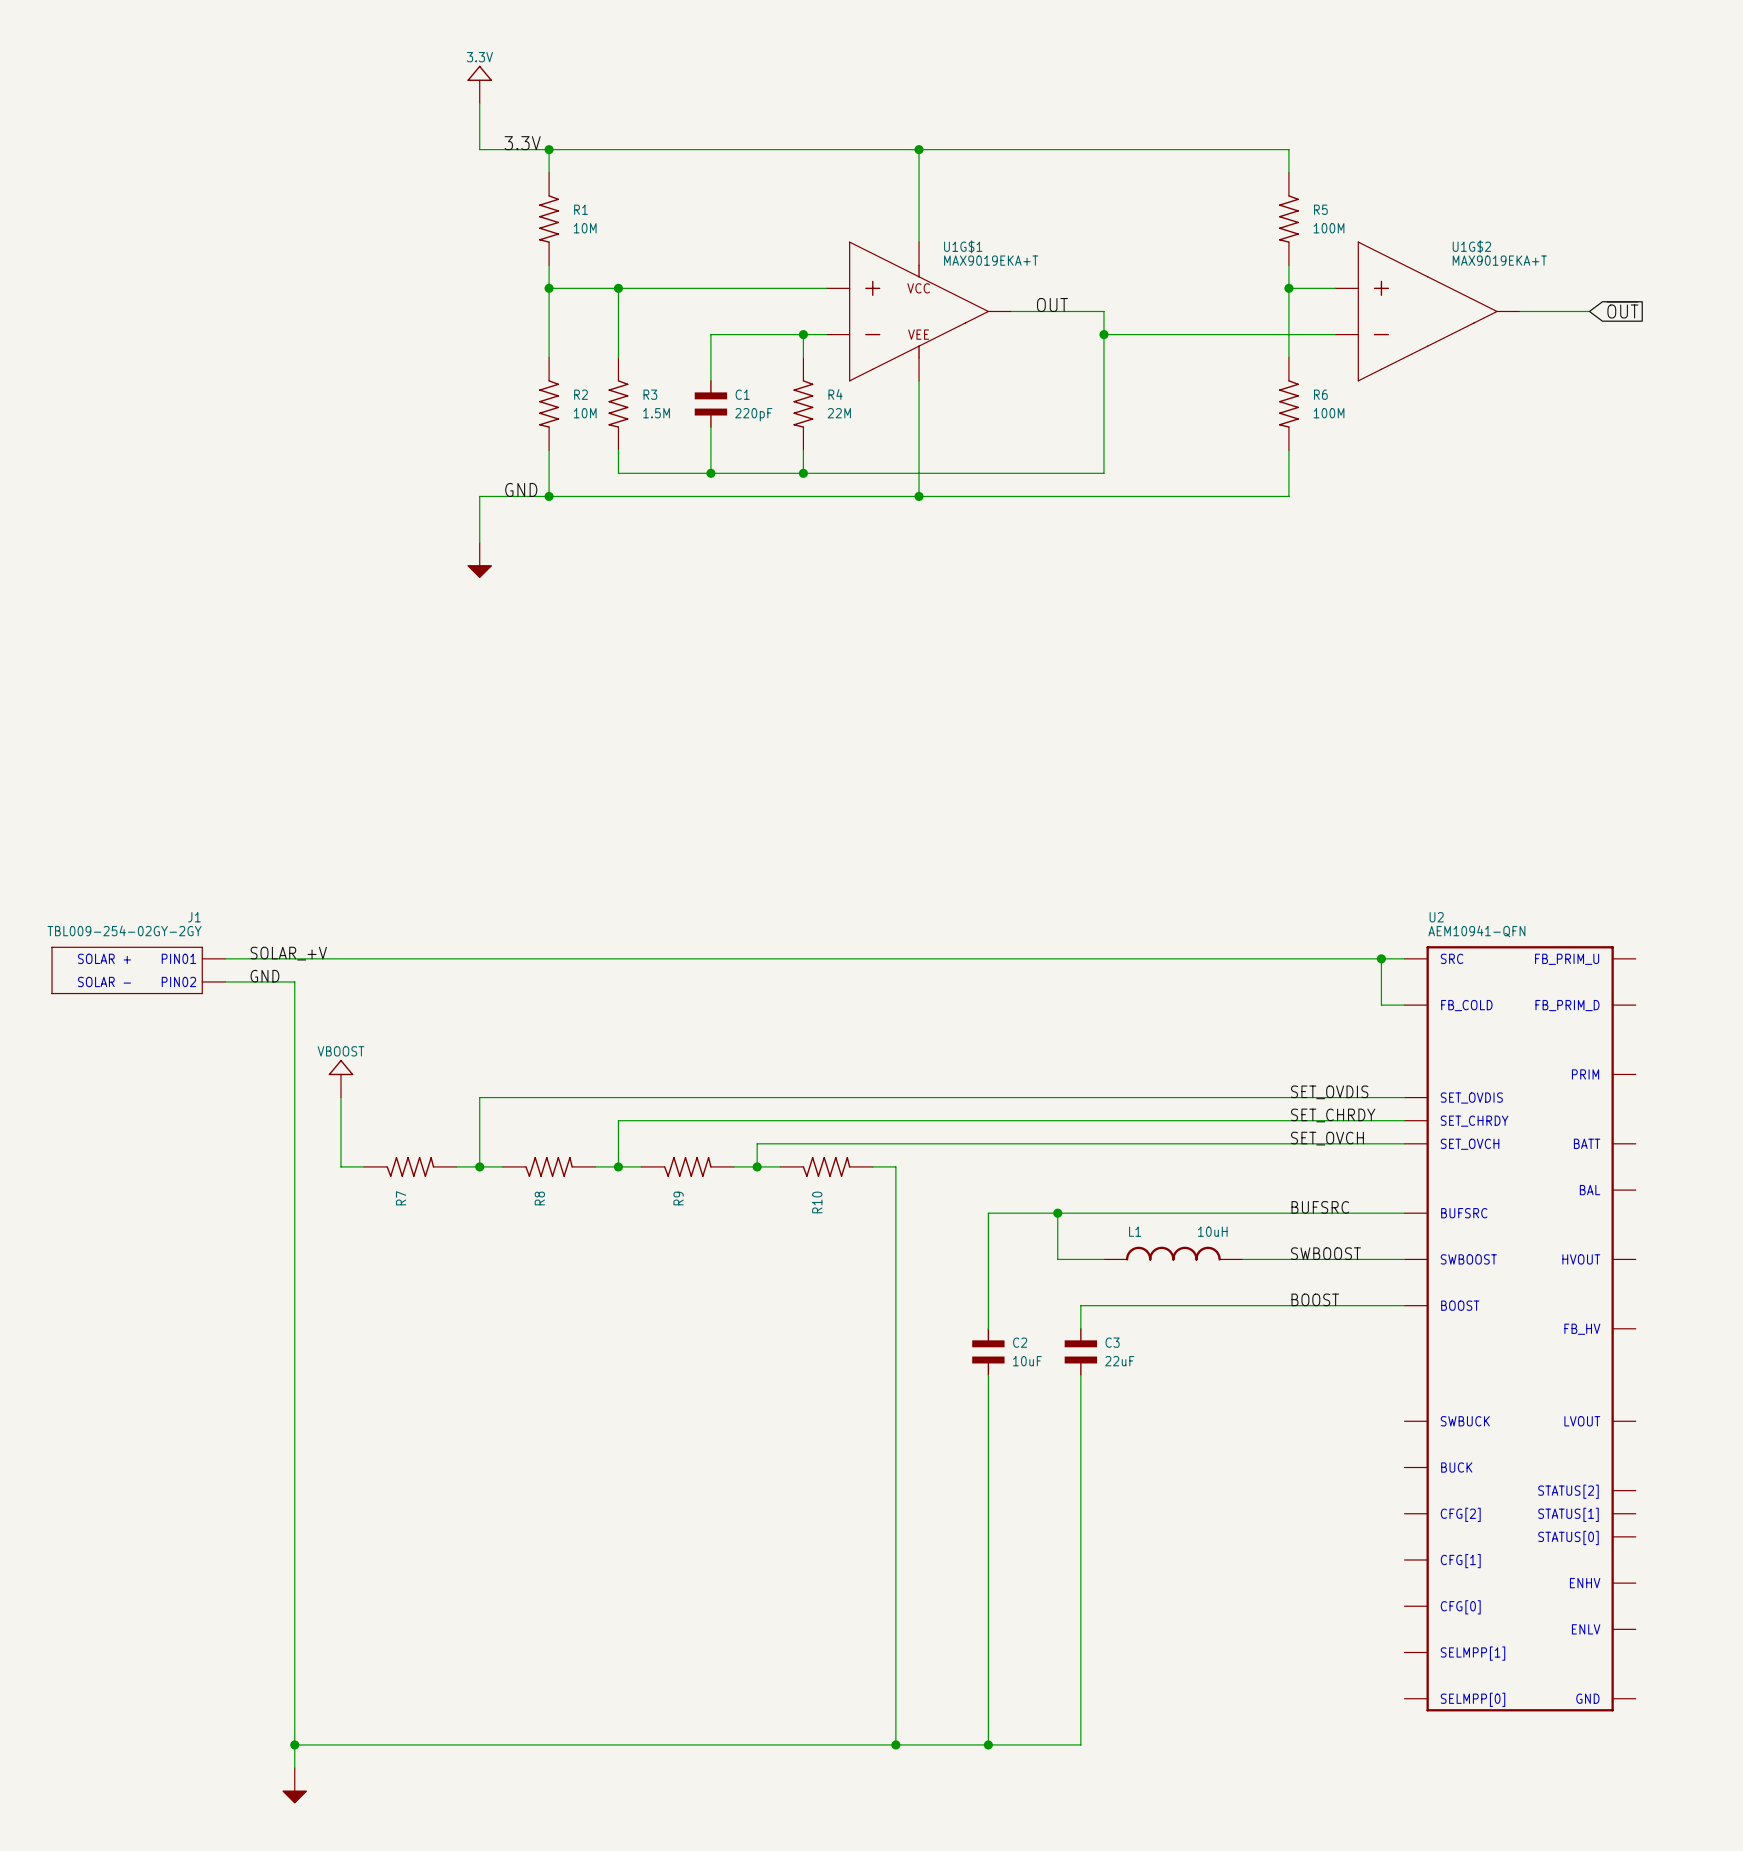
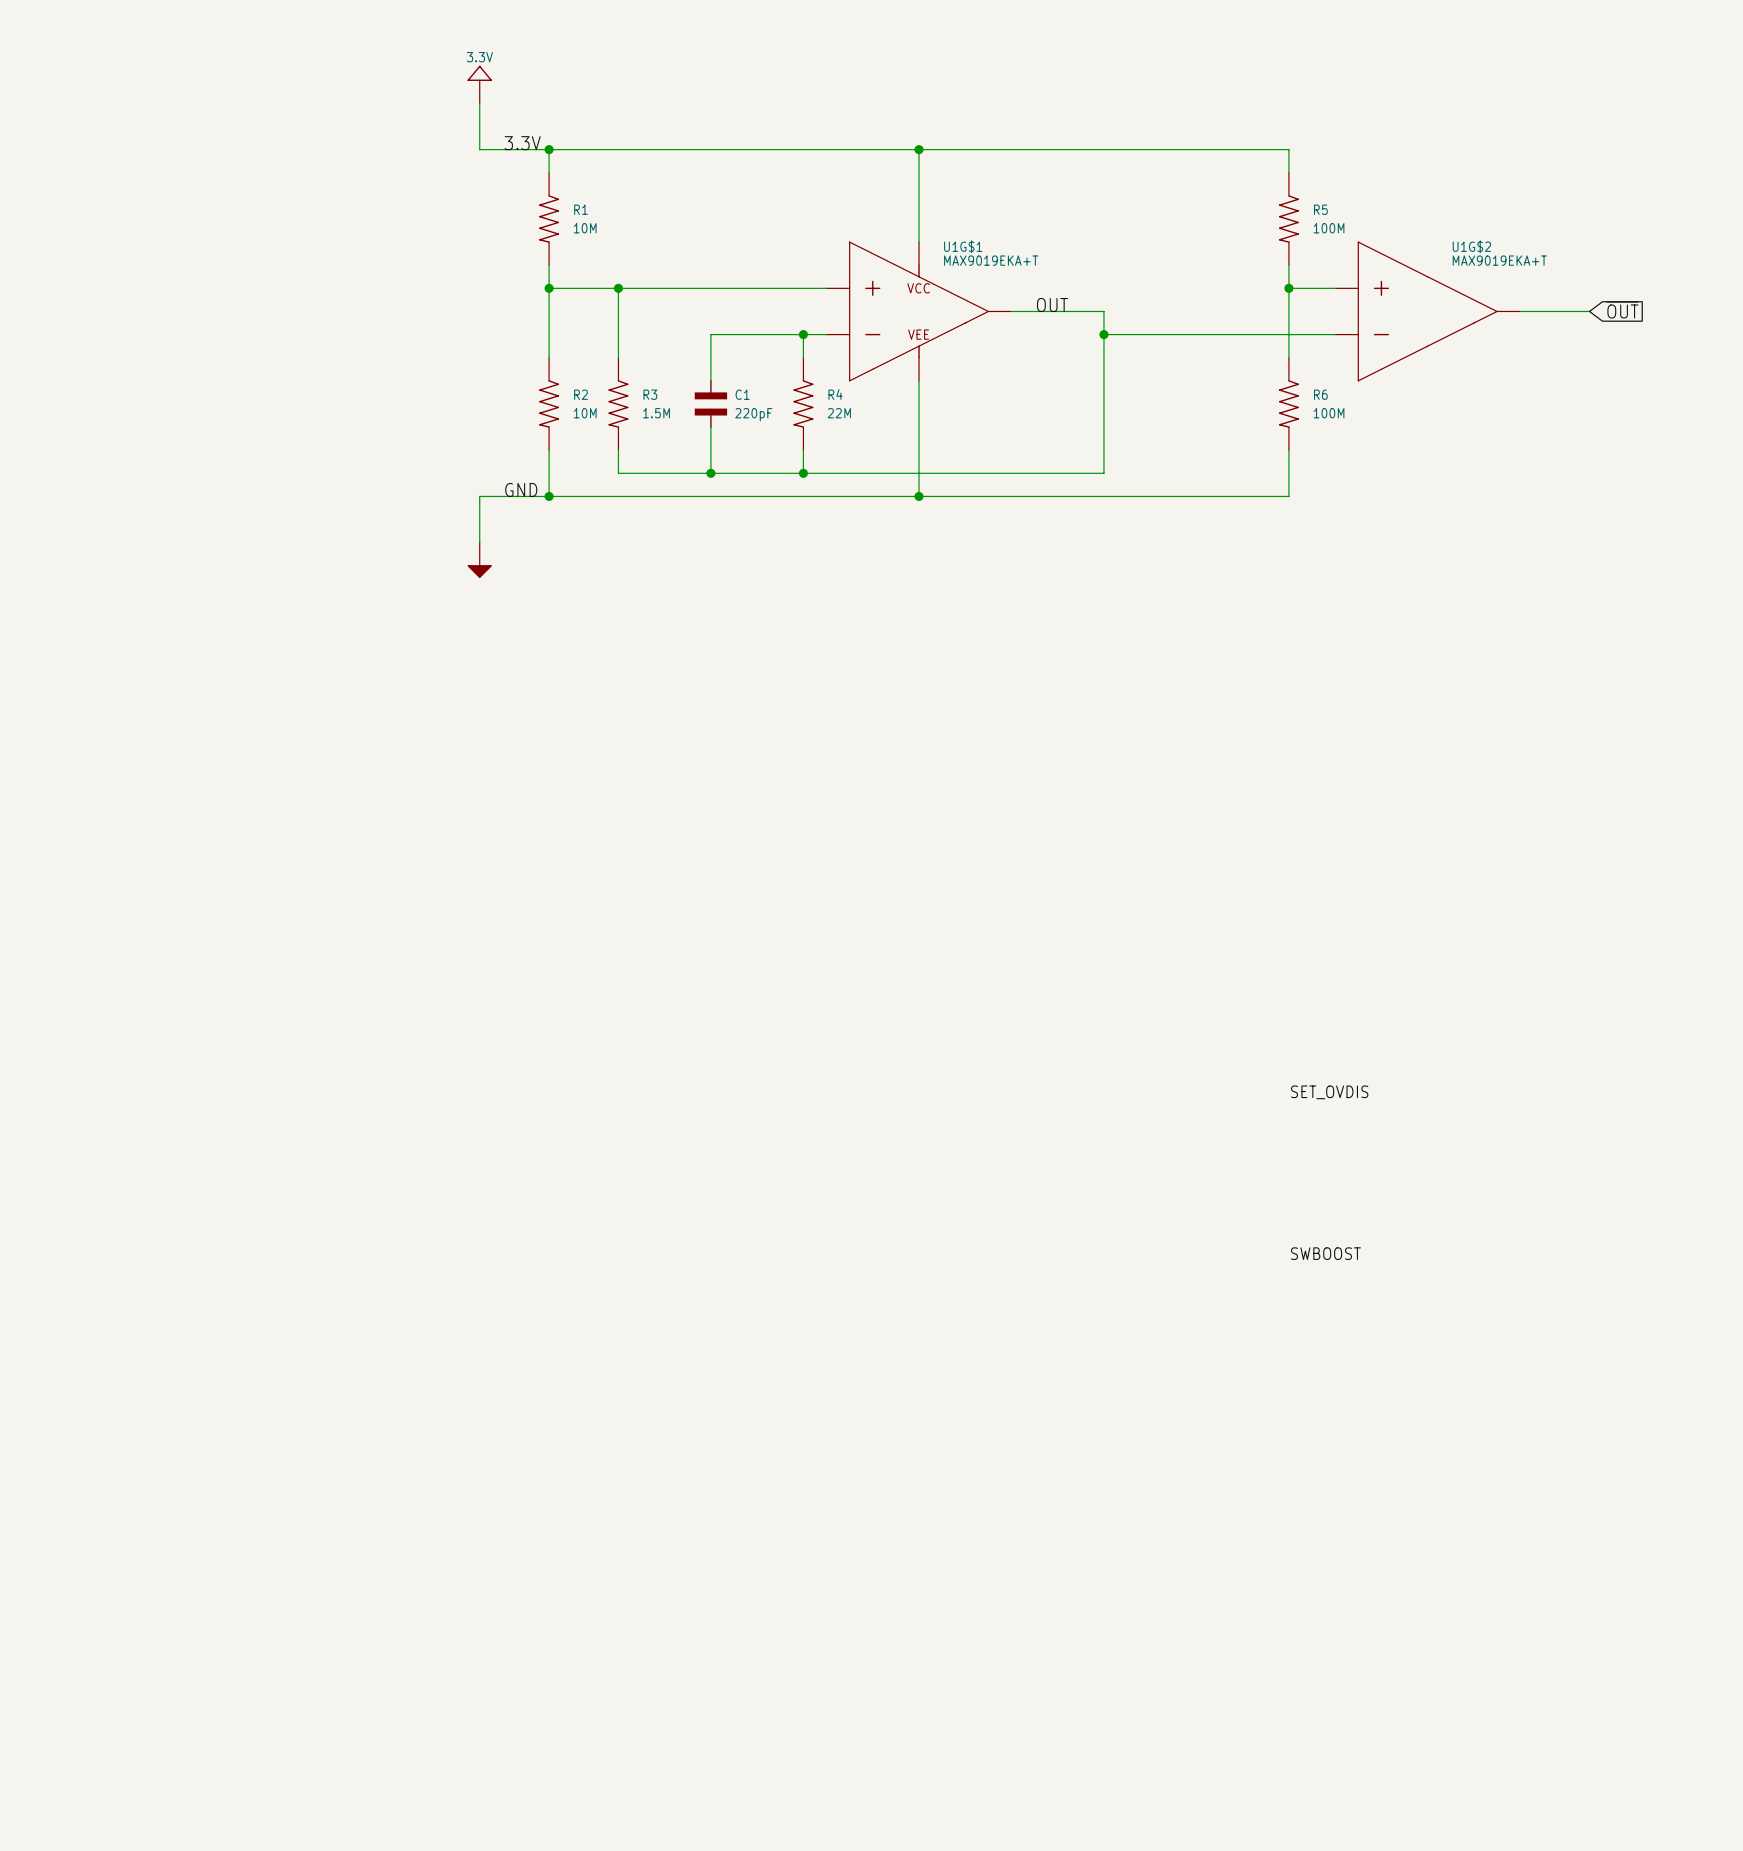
label: SOLAR_+V (288, 953) -> none
wire: (225, 958) (1404, 958) -> none
wire: (1381, 958) (1381, 1005) (1404, 1005) -> none
junction: (1381, 958) -> none
J1: TBL009-254-02GY-2GY (138, 970) -> none
label: GND (264, 976) -> none
wire: (225, 981) (294, 981) (294, 1768) -> none
power symbol: VBOOST (340, 1078) -> none
wire: (340, 1097) (340, 1166) (364, 1166) -> none
wire: (1404, 1097) (479, 1097) (479, 1166) -> none
label: SET_CHRDY (1333, 1115) -> none
wire: (1404, 1120) (618, 1120) (618, 1166) -> none
label: SET_OVCH (1327, 1138) -> none
wire: (1404, 1143) (757, 1143) (757, 1166) -> none
R7: (410, 1166) -> none
wire: (456, 1166) (502, 1166) -> none
junction: (479, 1166) -> none
R8: (549, 1166) -> none
wire: (595, 1166) (641, 1166) -> none
junction: (618, 1166) -> none
R9: (687, 1166) -> none
wire: (734, 1166) (780, 1166) -> none
junction: (757, 1166) -> none
R10: (826, 1166) -> none
wire: (872, 1166) (895, 1166) (895, 1744) -> none
label: BUFSRC (1320, 1207) -> none
wire: (1057, 1213) (1057, 1259) (1103, 1259) -> none
junction: (1057, 1213) -> none
wire: (1404, 1213) (988, 1213) (988, 1328) -> none
L1: 10uH (1173, 1253) -> none
wire: (1242, 1259) (1404, 1259) -> none
label: BOOST (1315, 1299) -> none
wire: (1404, 1305) (1080, 1305) (1080, 1328) -> none
U2: AEM10941-QFN (1520, 1328) -> none
C2: 10uF (988, 1351) -> none
C3: 22uF (1080, 1351) -> none
wire: (988, 1375) (988, 1744) -> none
wire: (1080, 1375) (1080, 1744) (294, 1744) -> none
junction: (294, 1744) -> none
junction: (895, 1744) -> none
junction: (988, 1744) -> none
power symbol: (294, 1785) -> none

